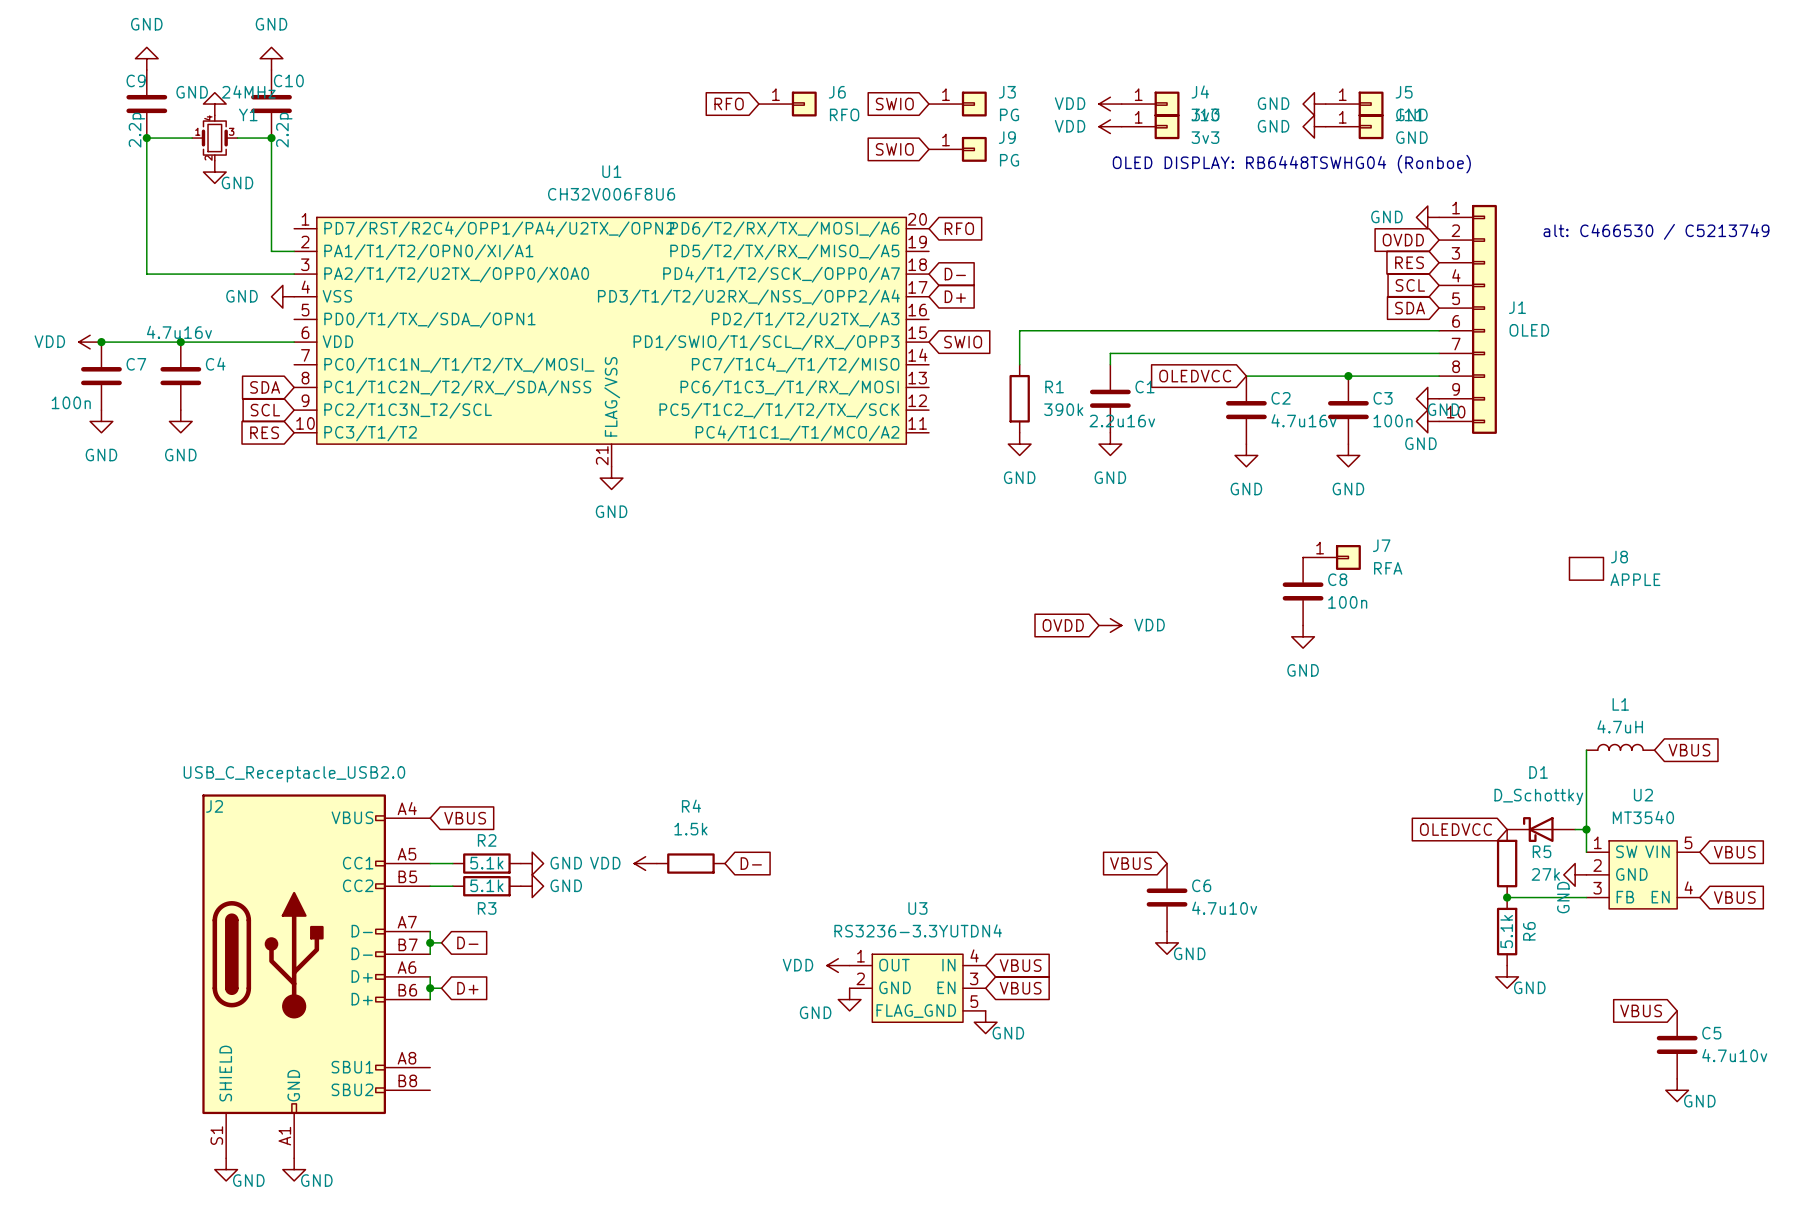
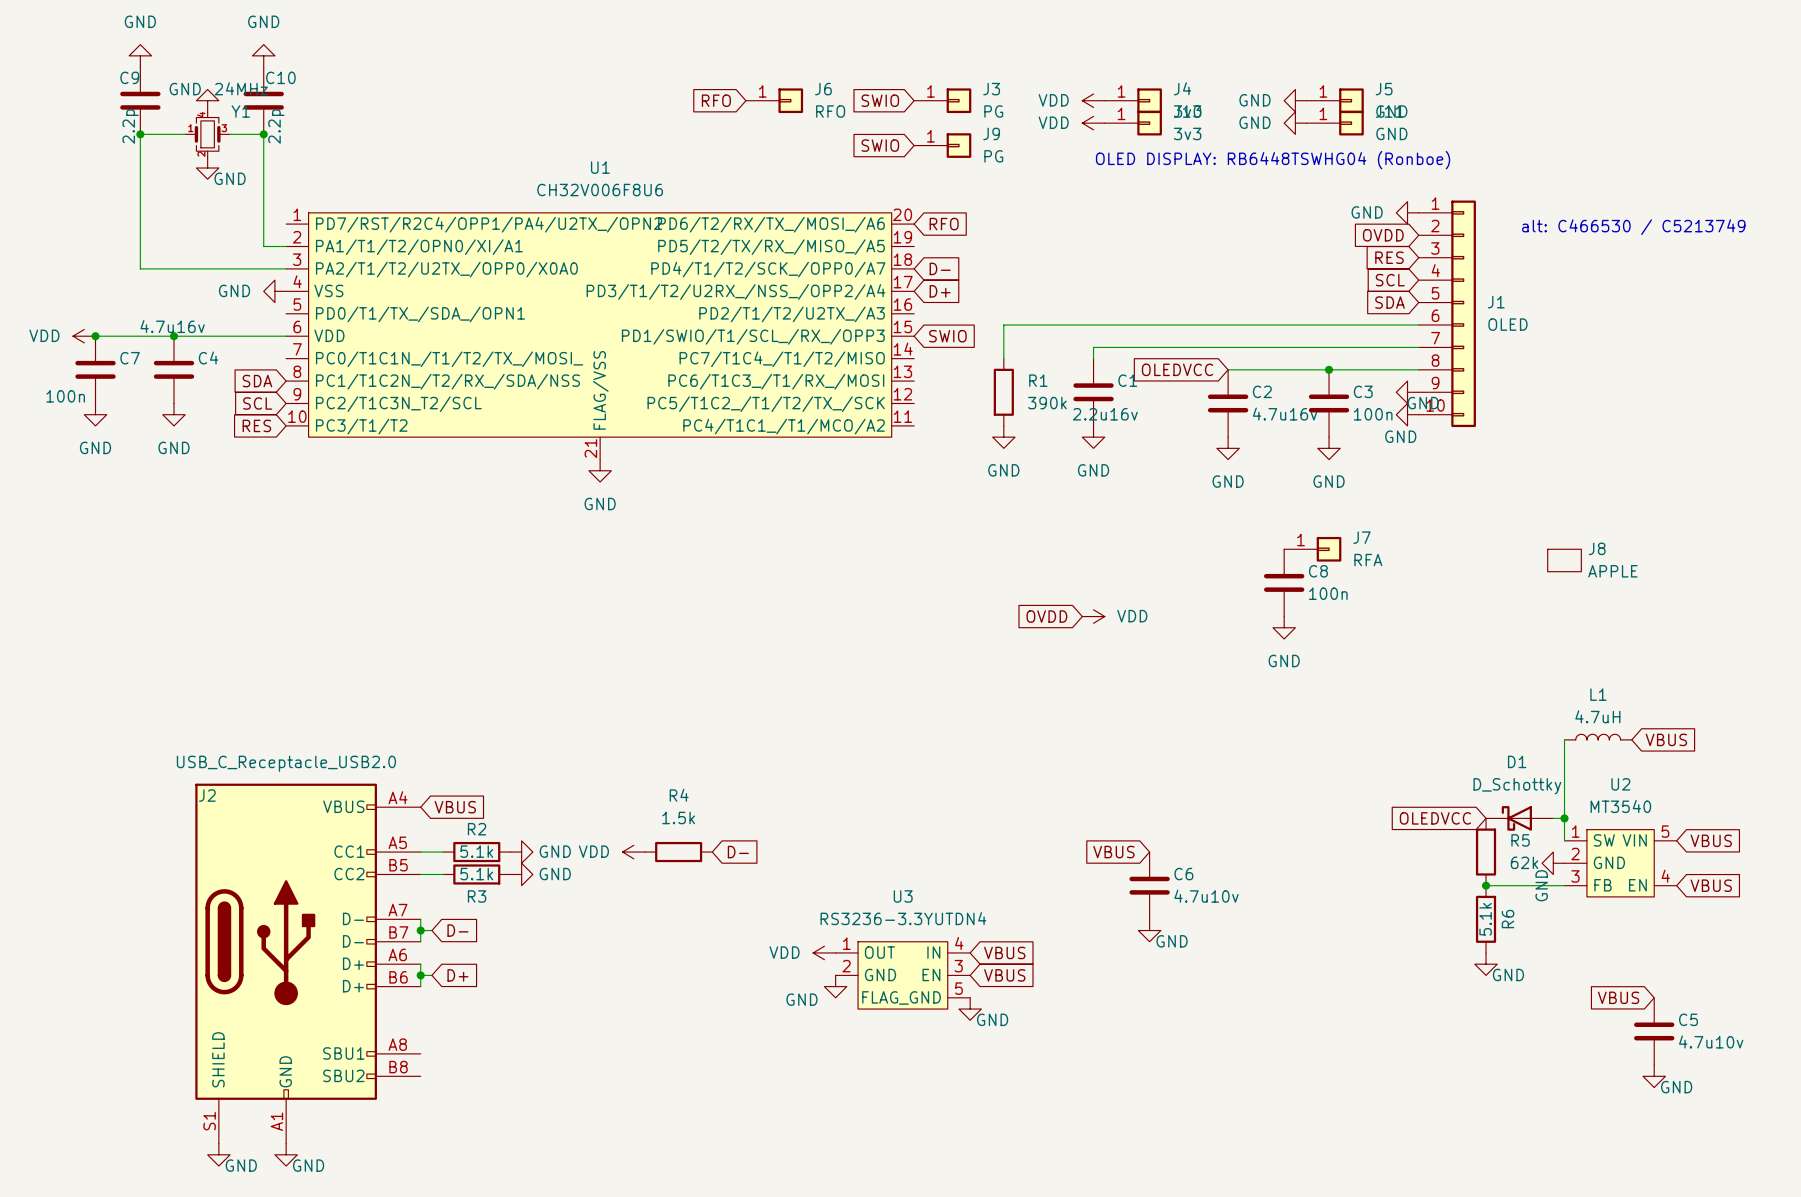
R5 value: 27k (1545, 874) -> 62k (1524, 862)

